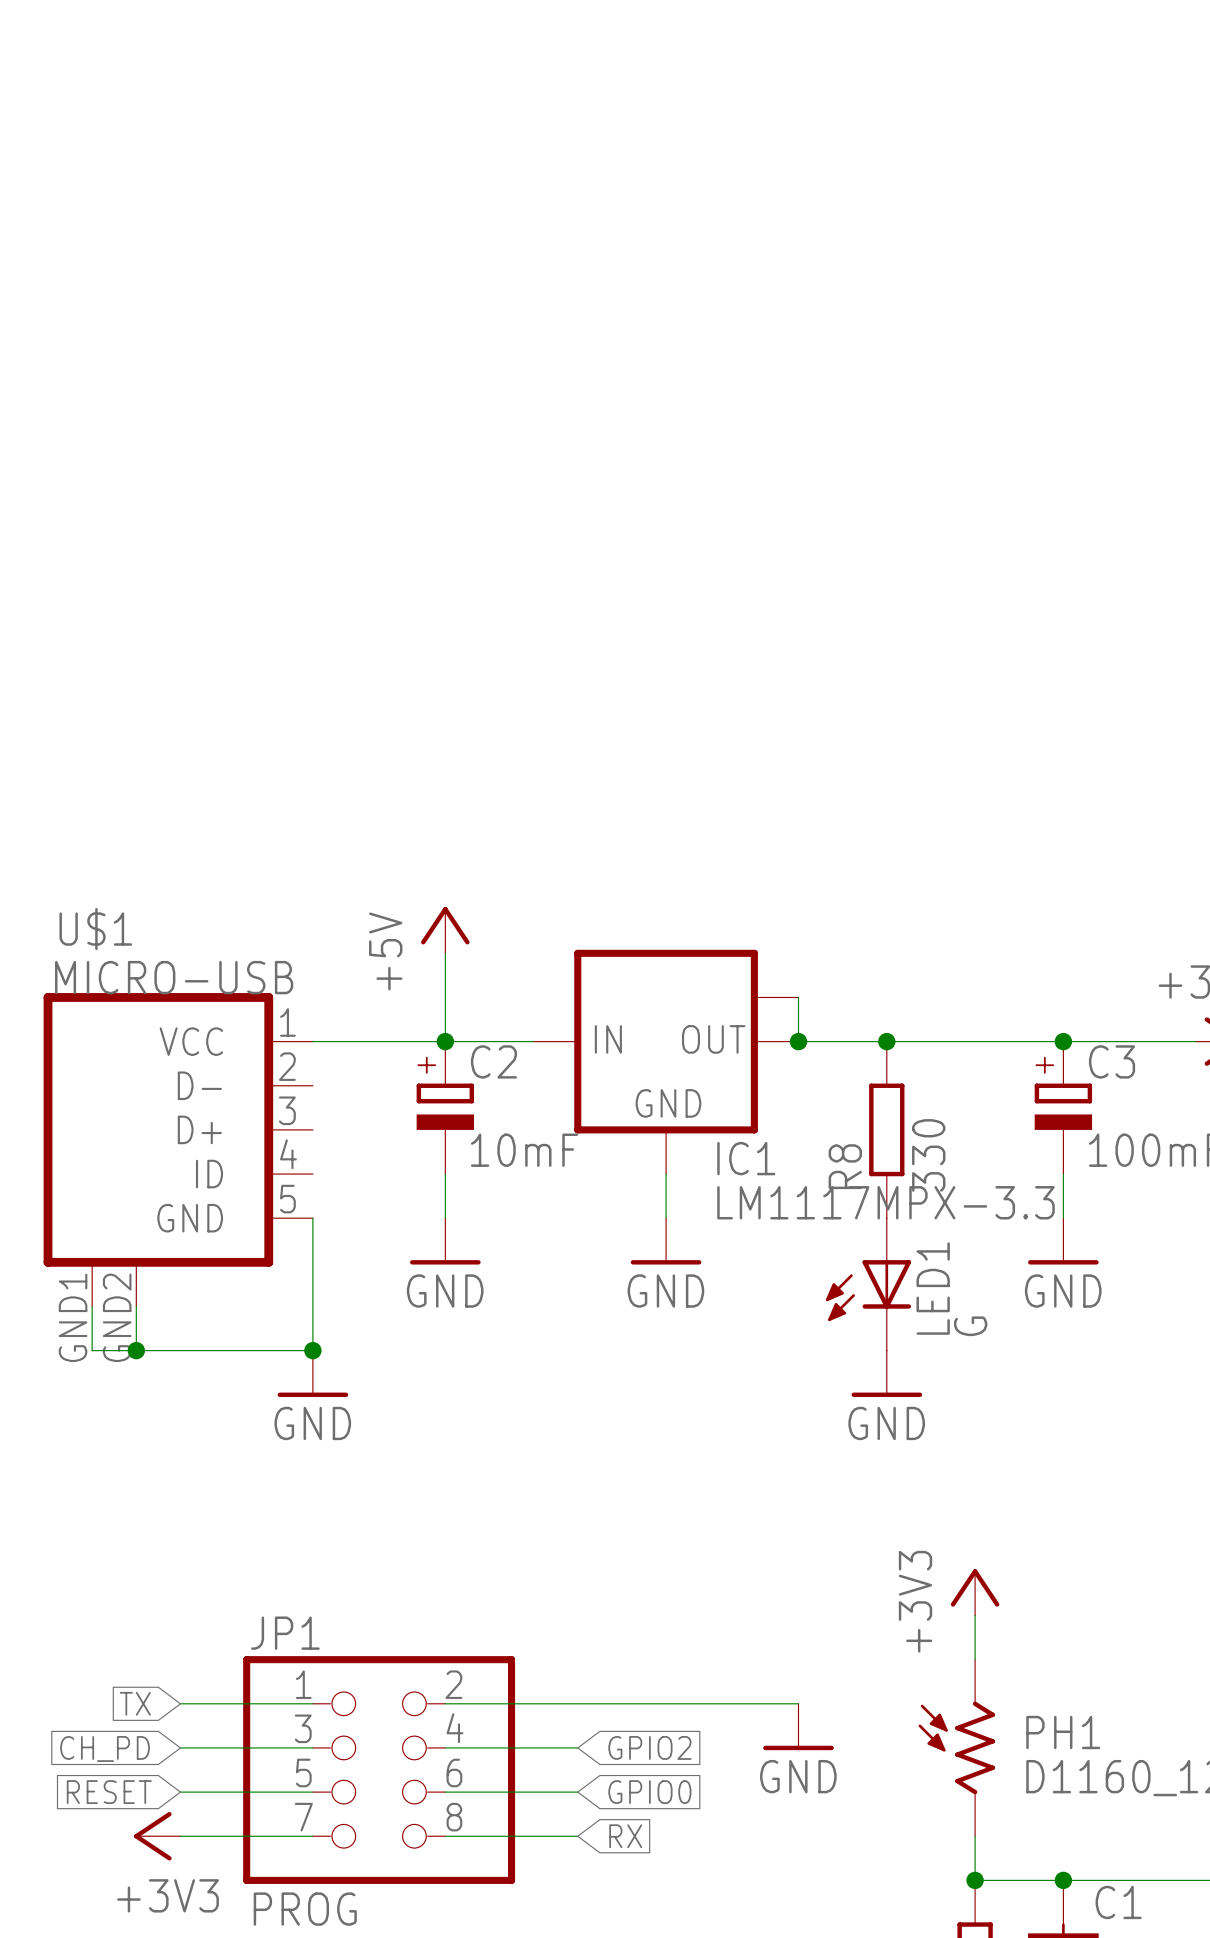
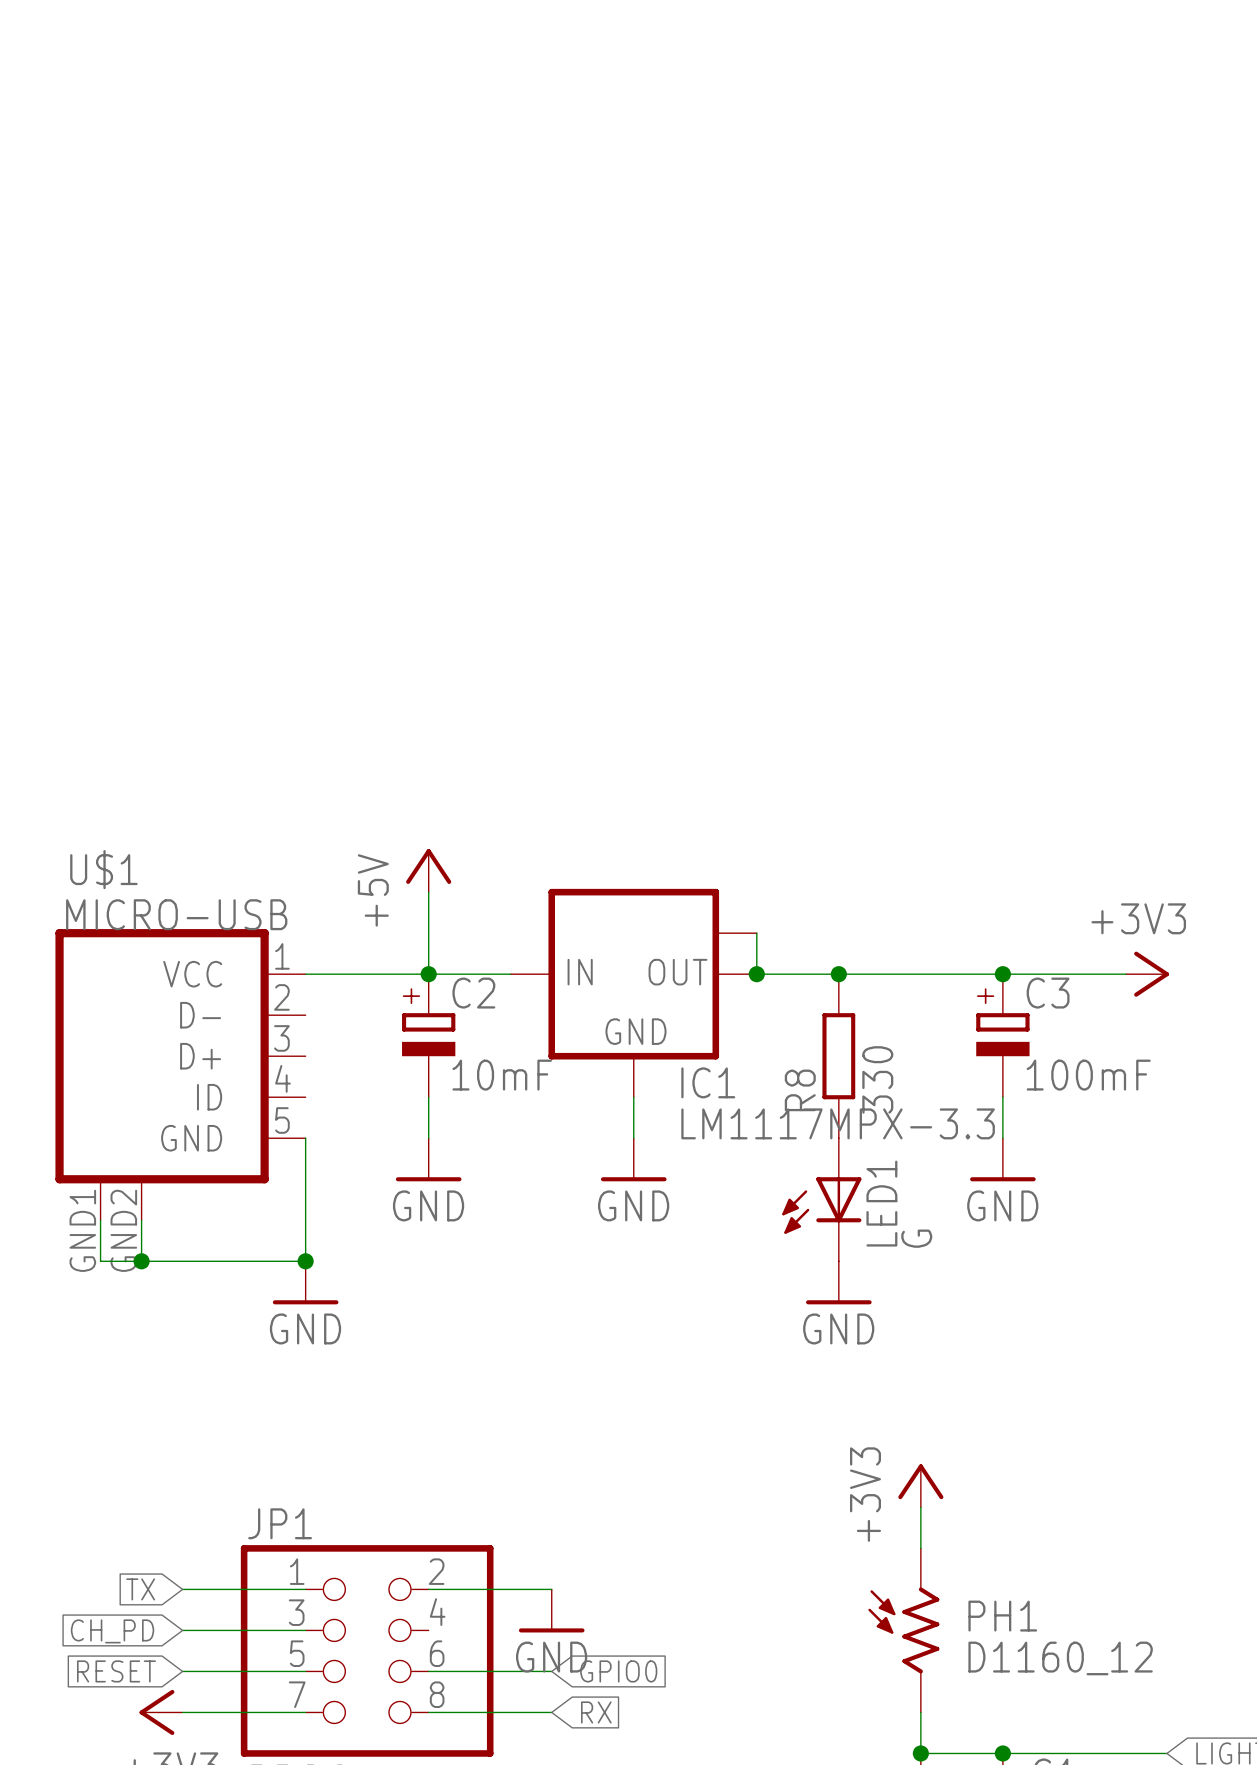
wire: (577, 1703) (798, 1703) -> none
power symbol position: GND (798, 1726) -> GND (551, 1610)
wire: (445, 1747) (577, 1747) -> none
global label: GPIO2 (649, 1747) -> none

